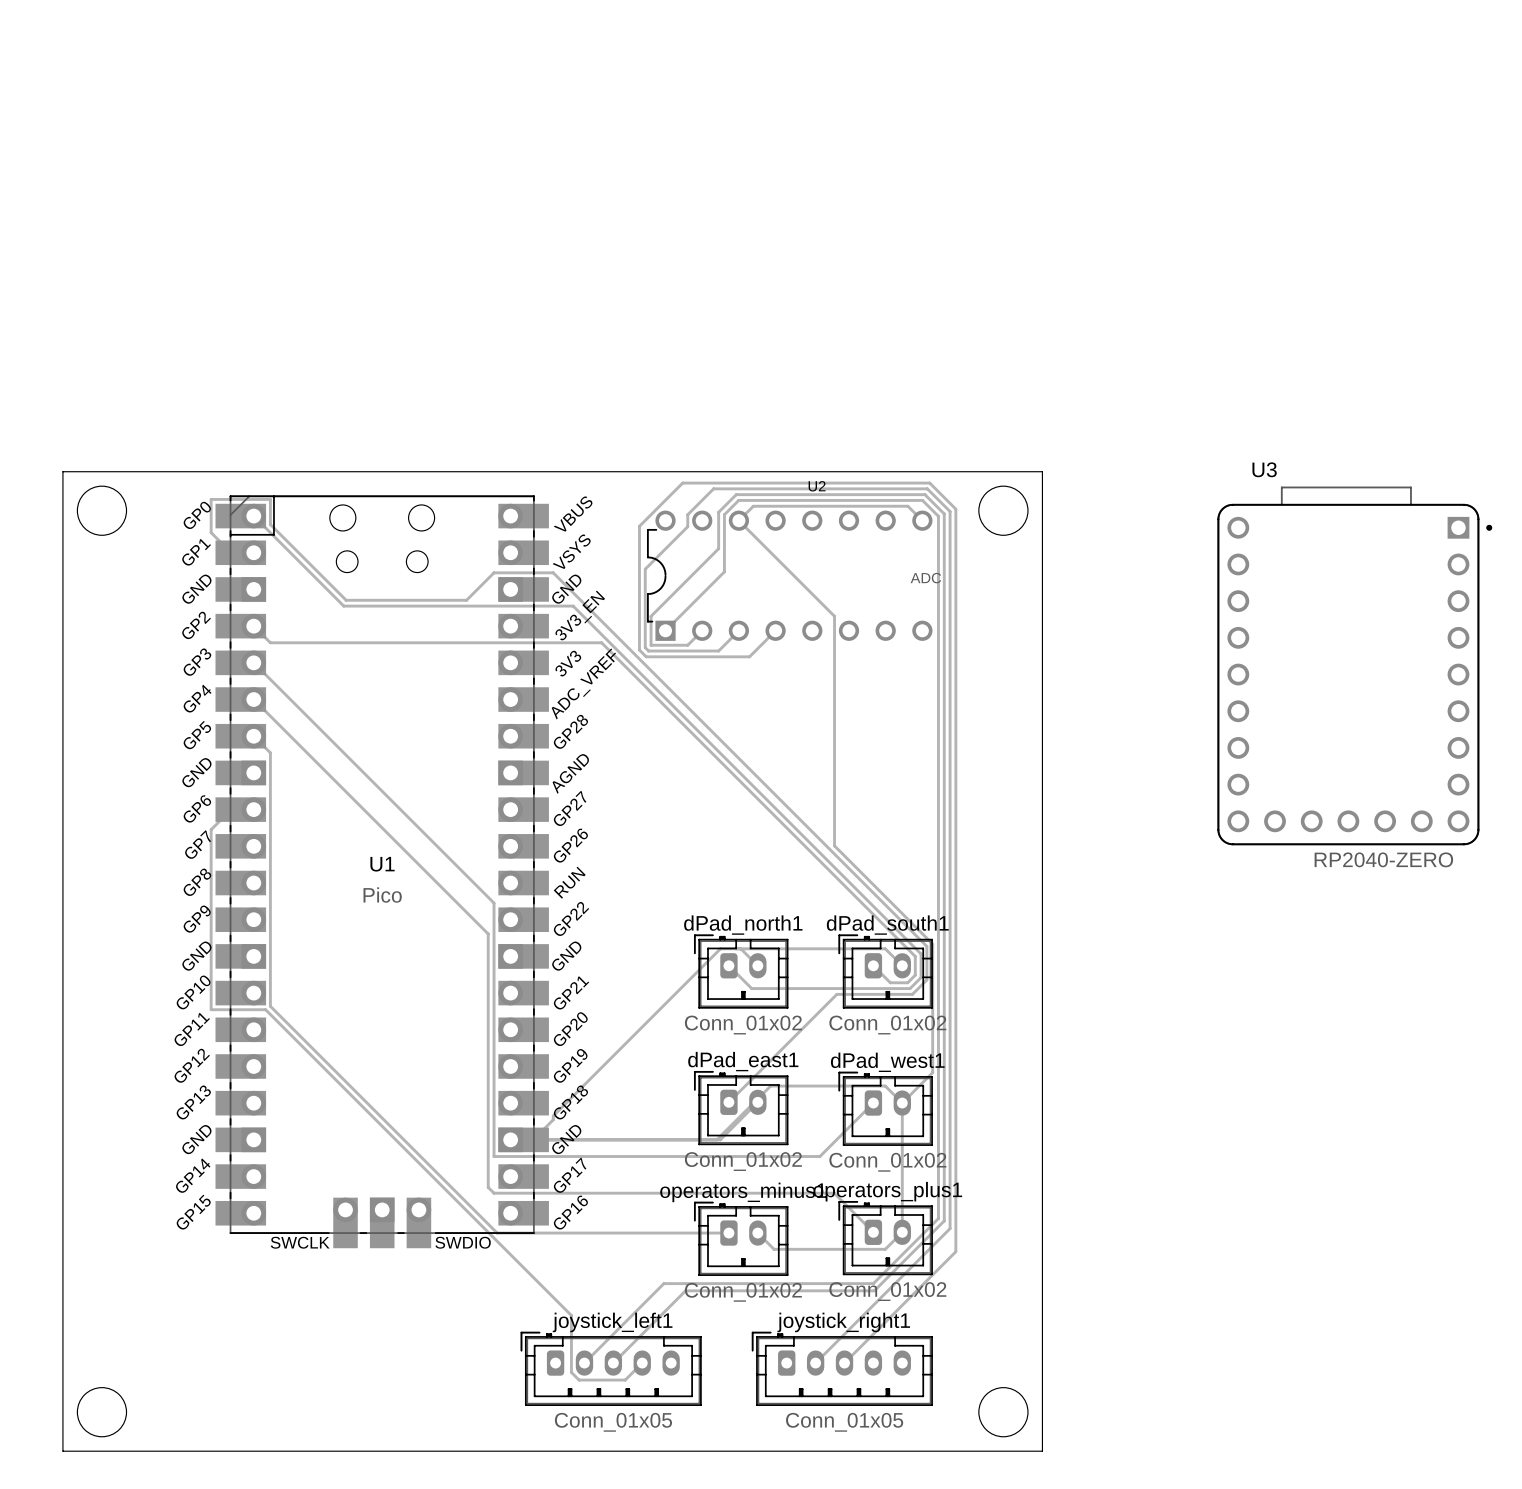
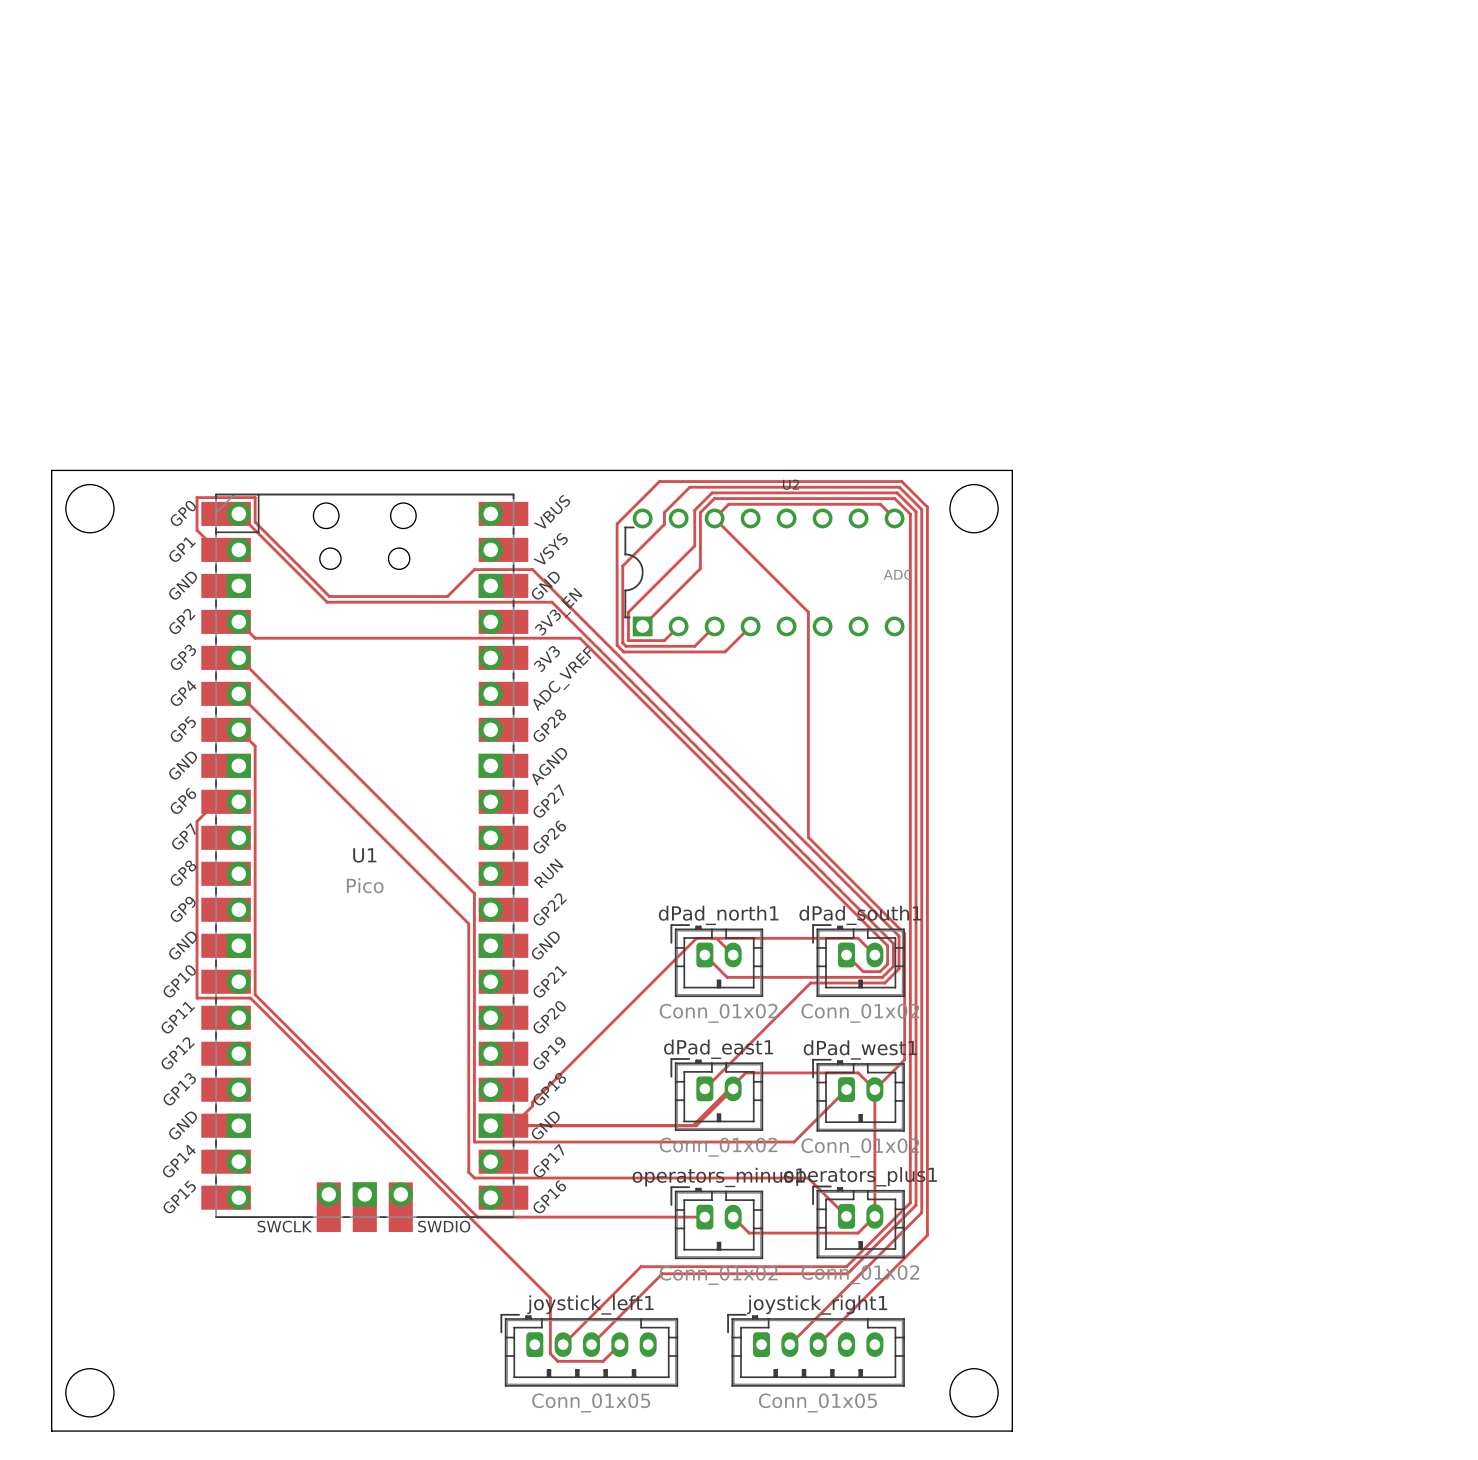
U3: RP2040-ZERO (1354, 665) -> none

